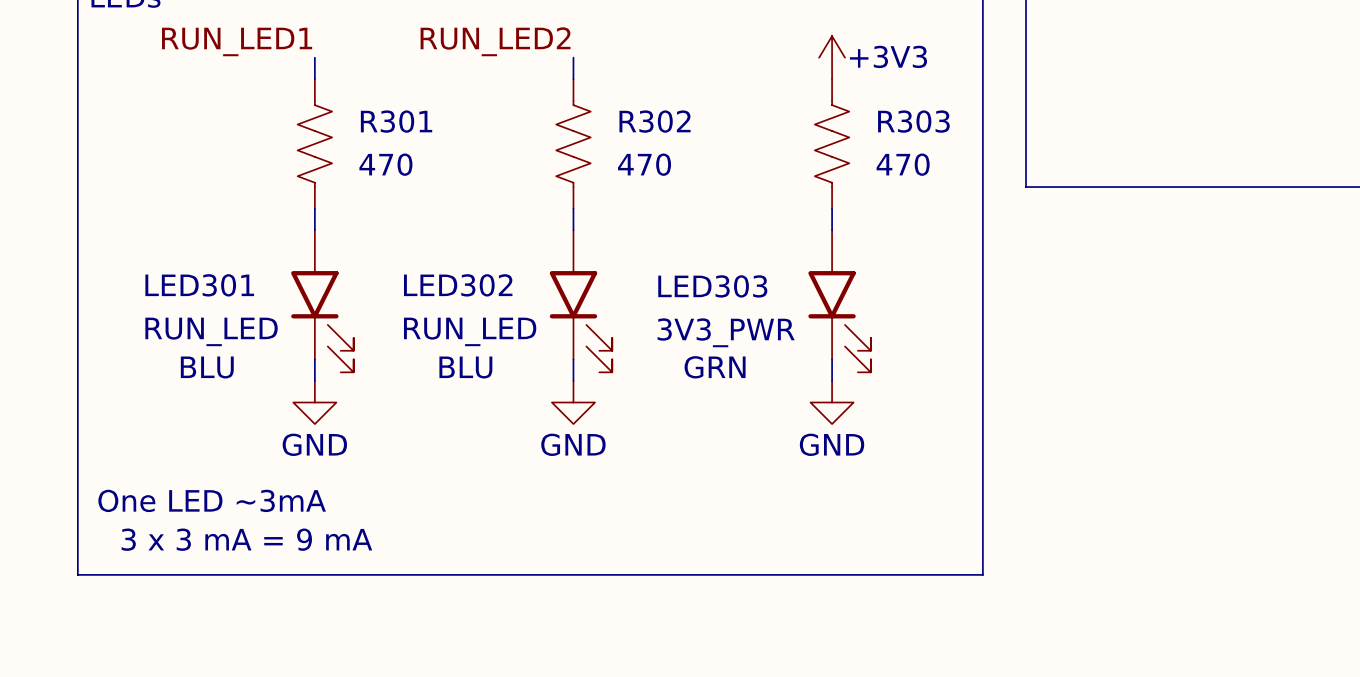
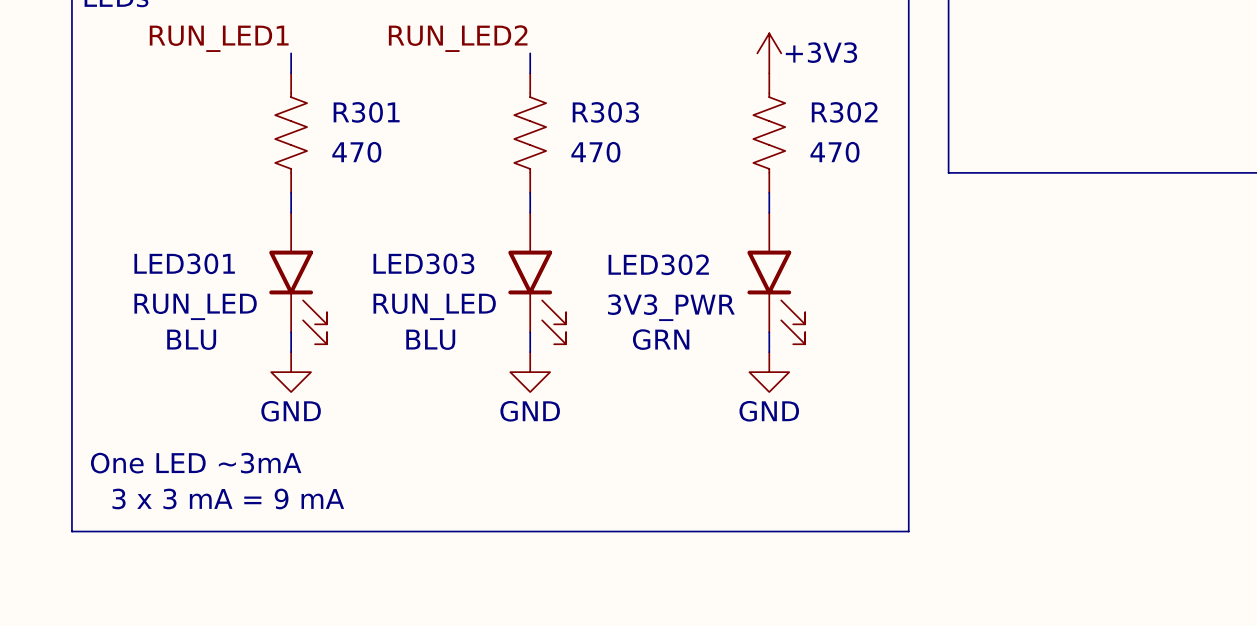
R302 name: R302 (655, 121) -> R303 (605, 112)
R303 name: R303 (913, 121) -> R302 (844, 112)
LED302 name: LED302 (458, 285) -> LED303 (423, 263)
LED303 name: LED303 (712, 286) -> LED302 (658, 264)

